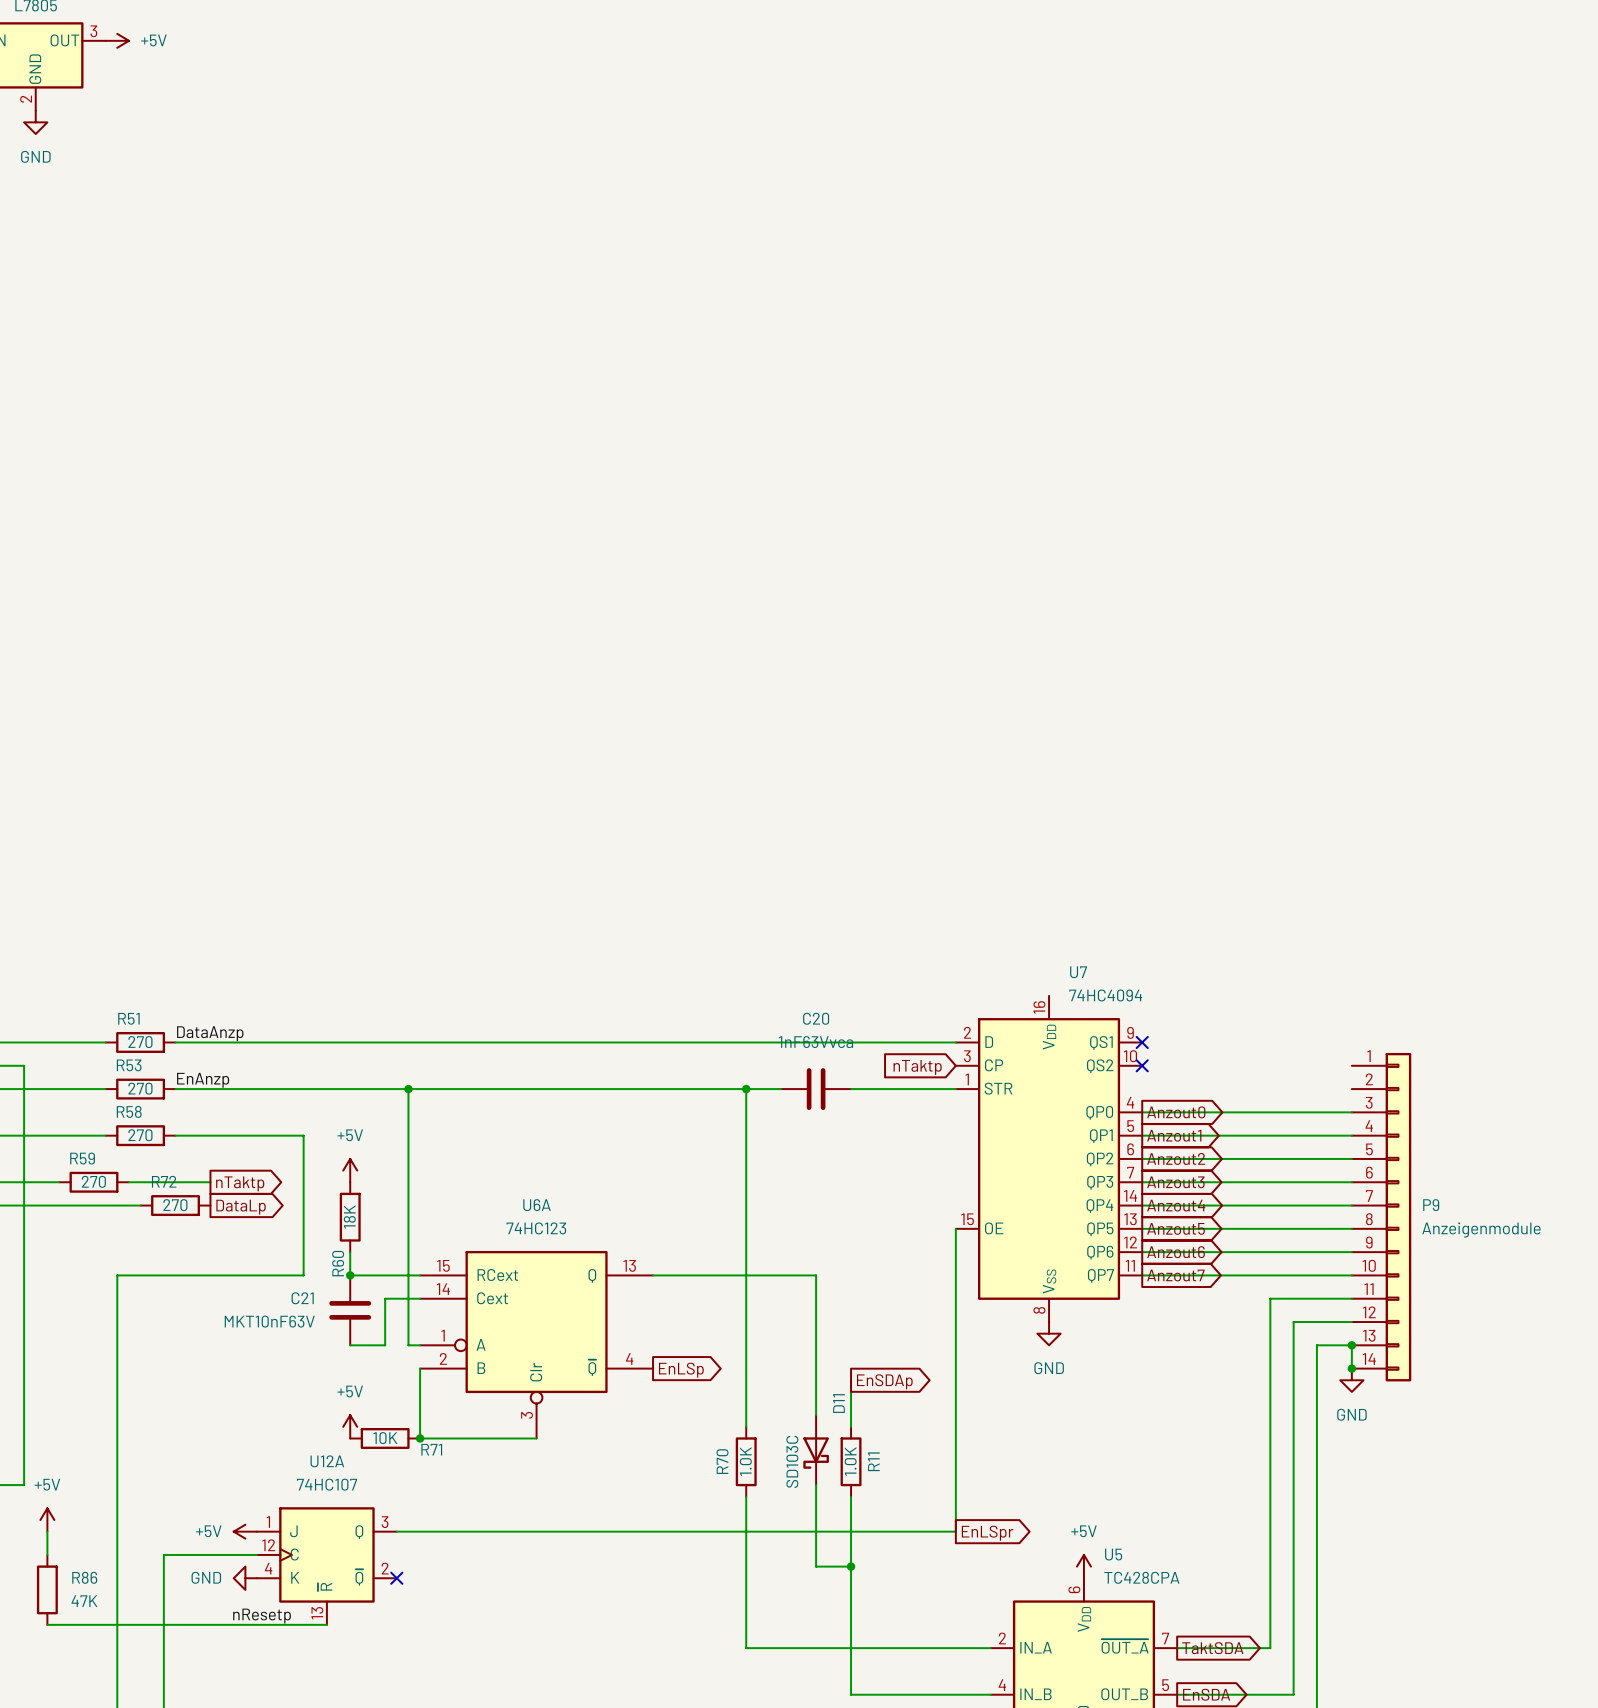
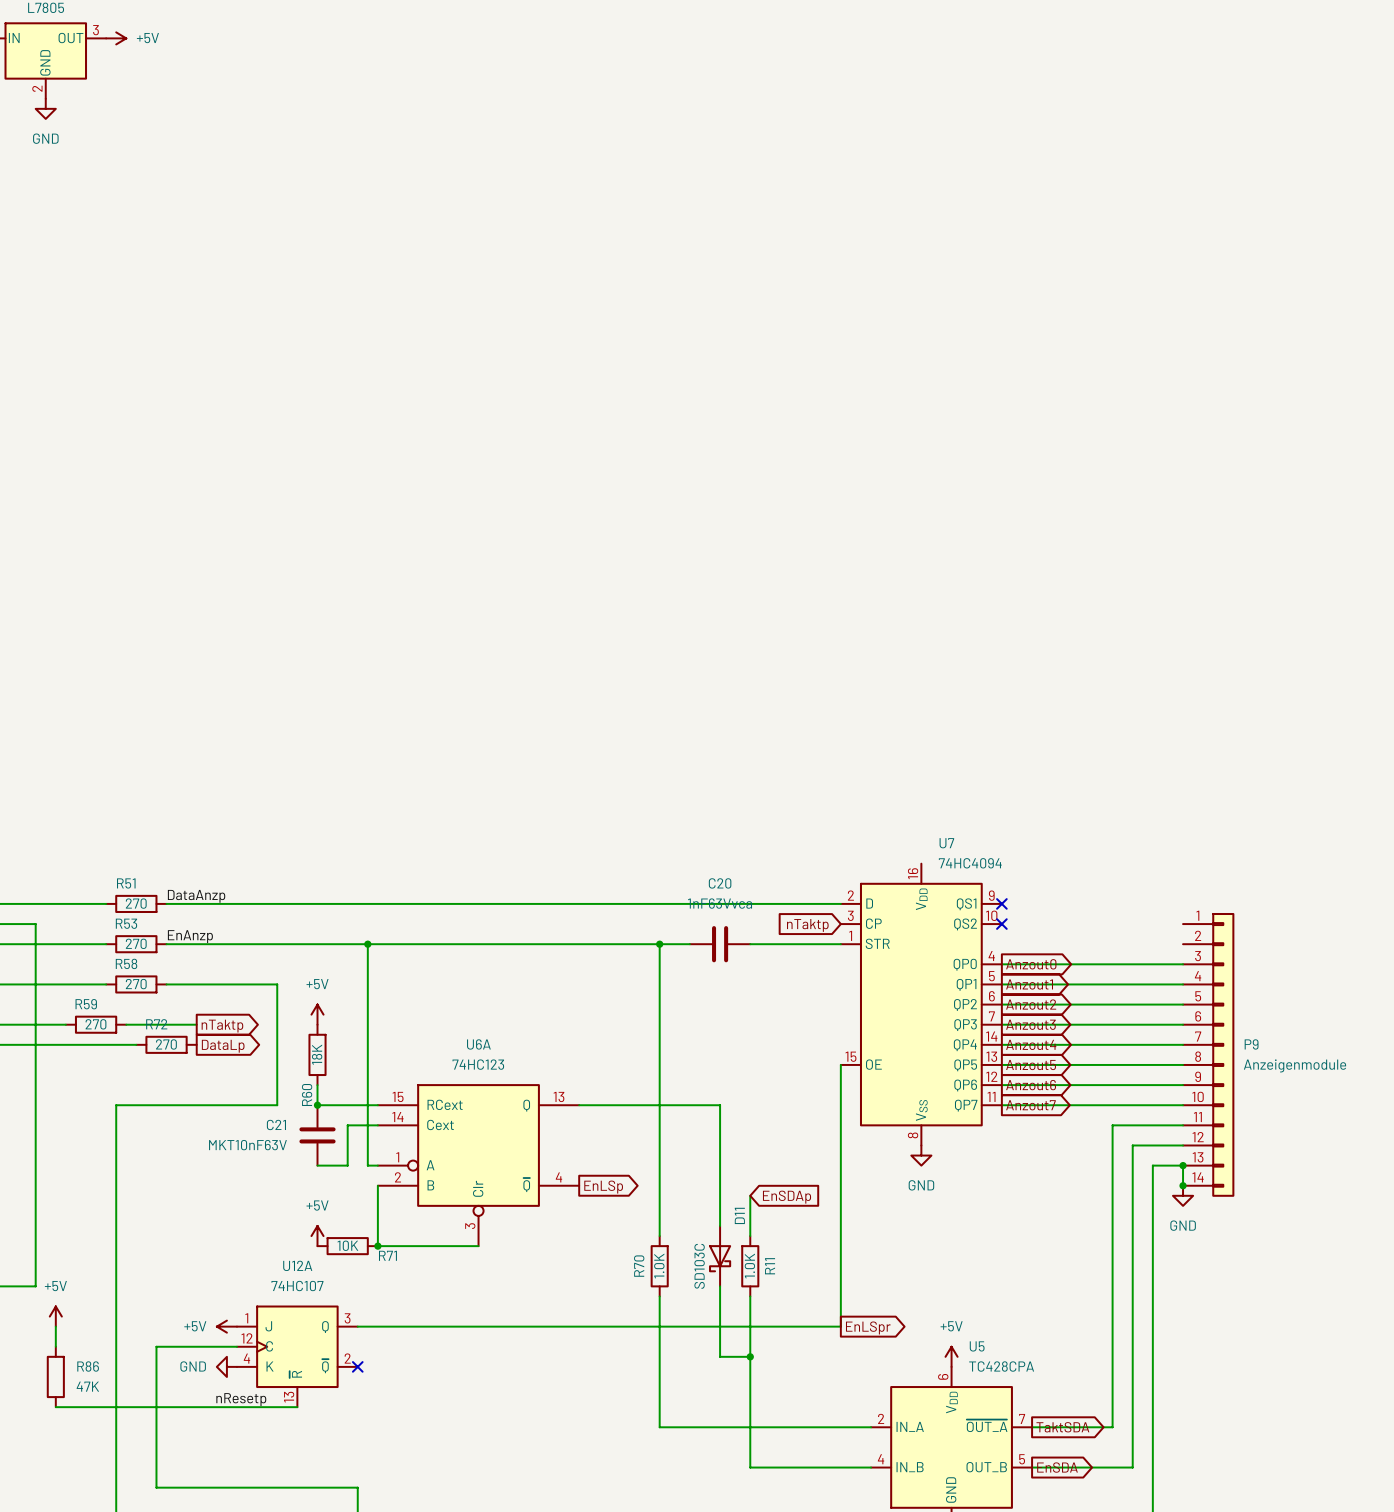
global label shape: output (884, 1381) -> input (787, 1197)

